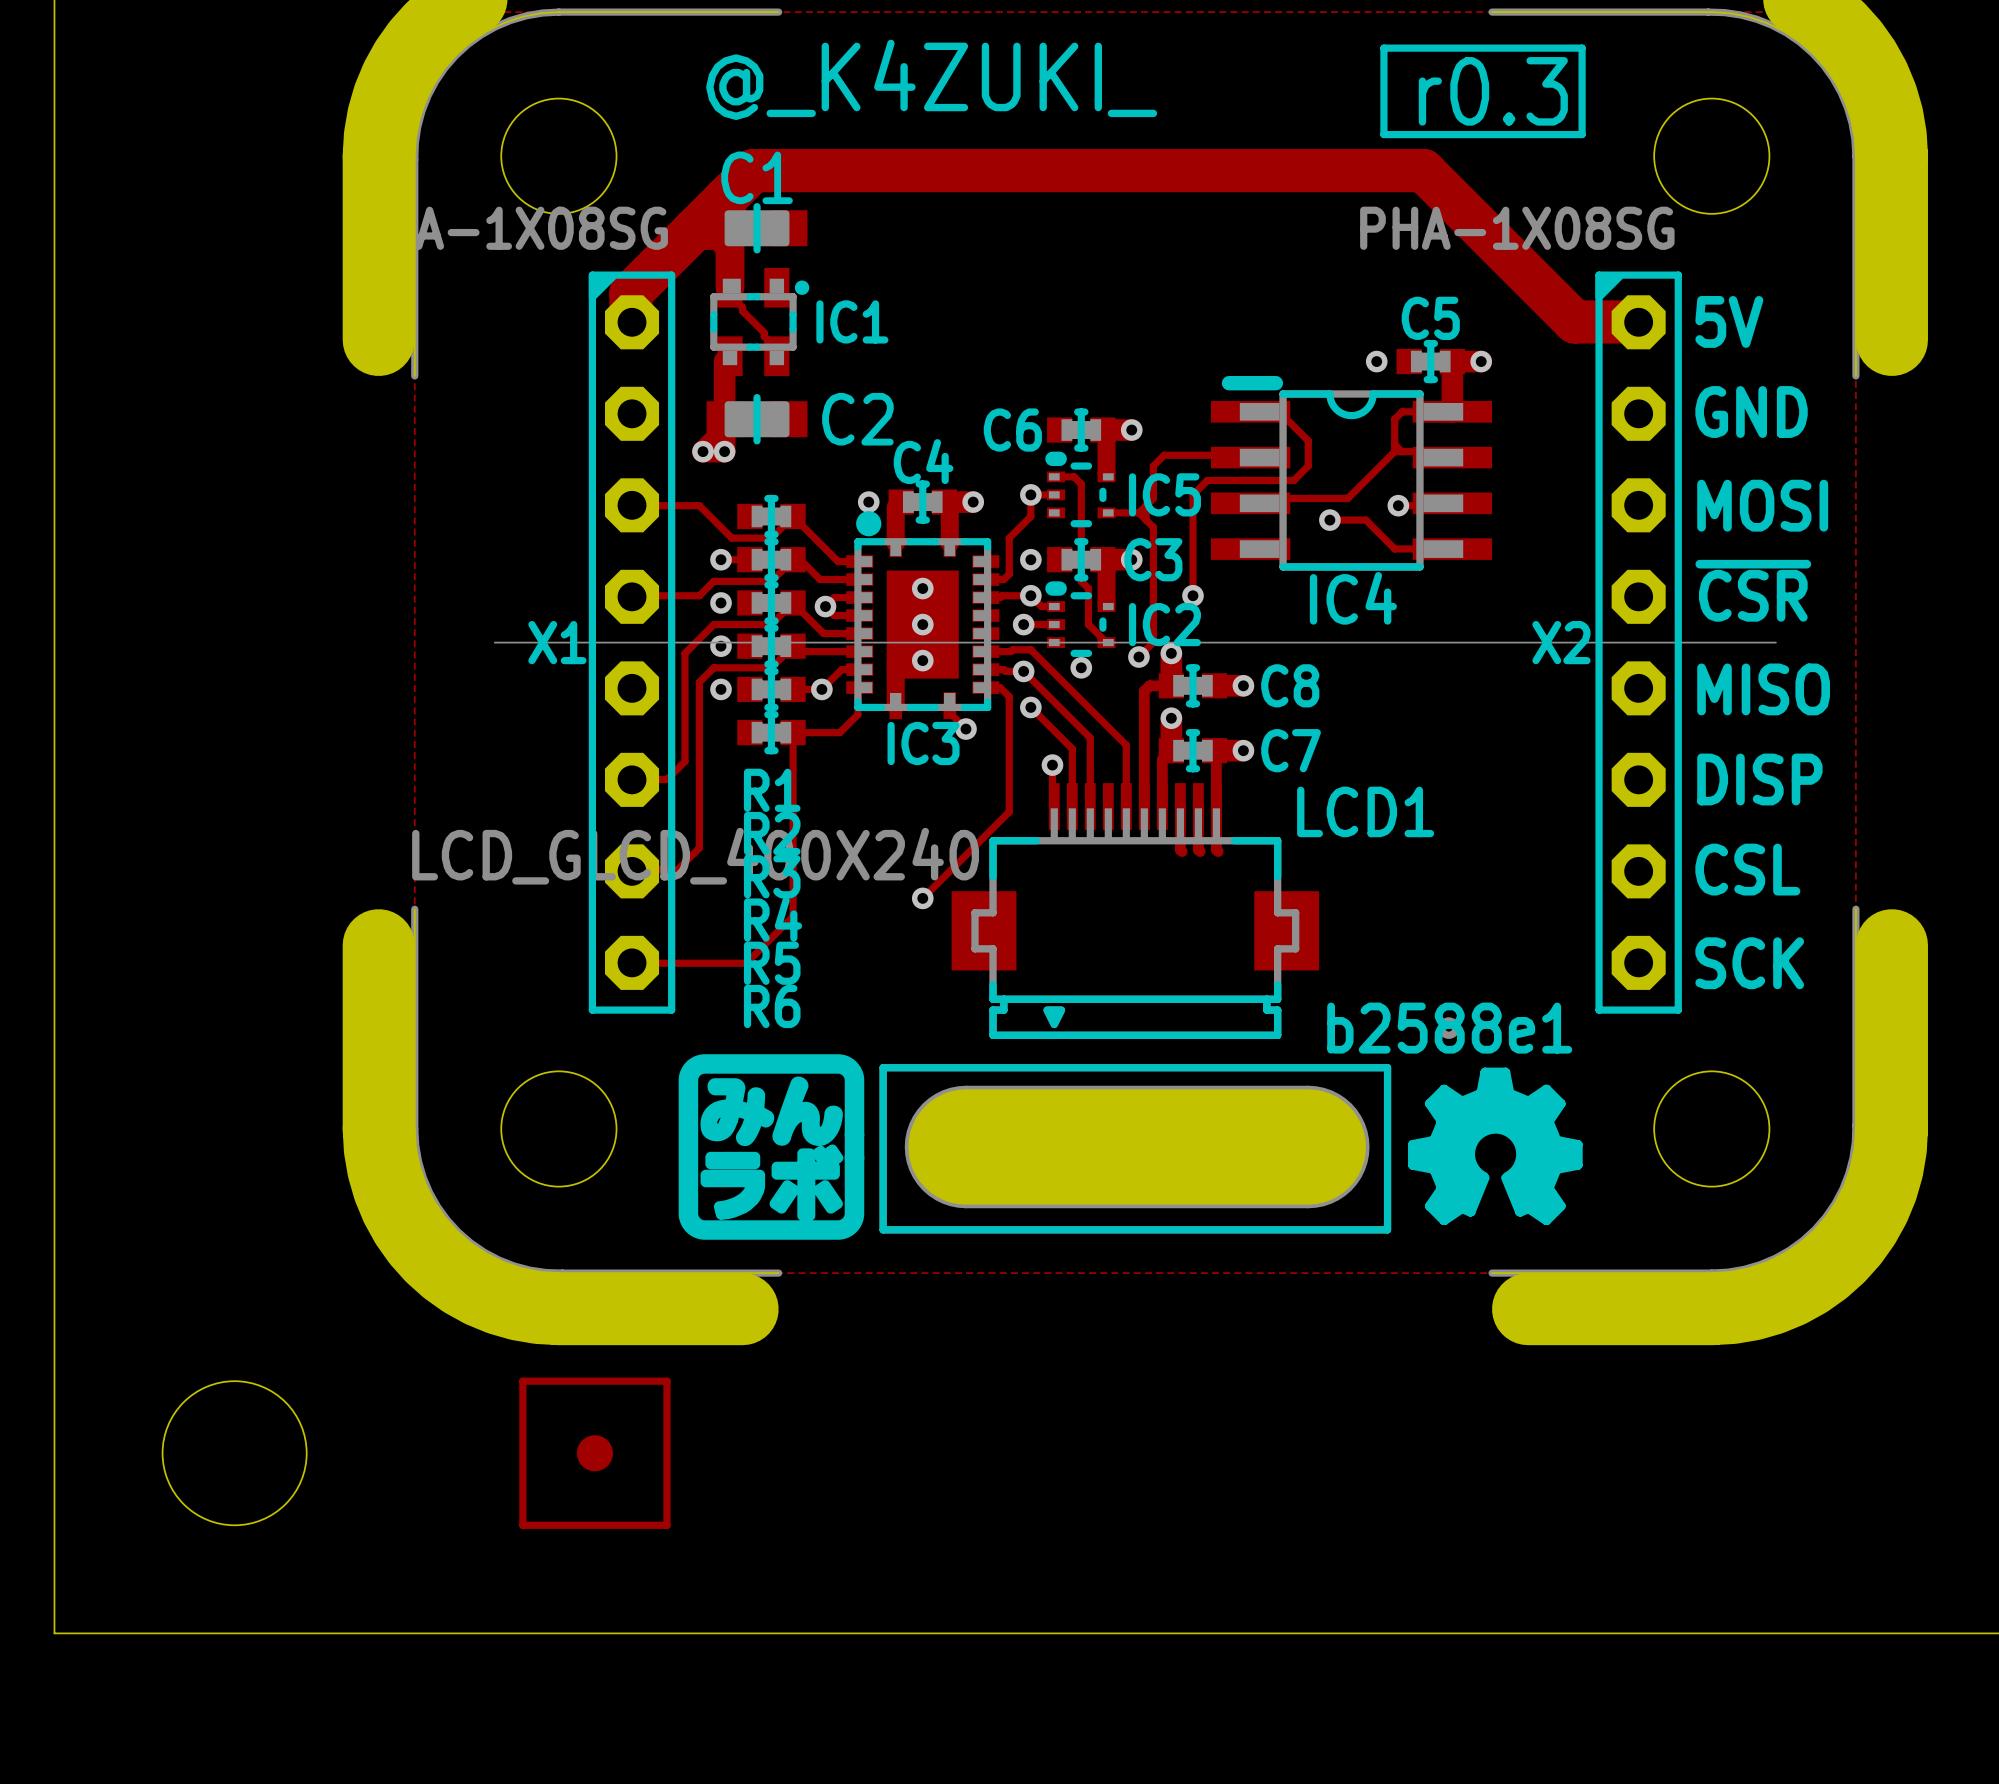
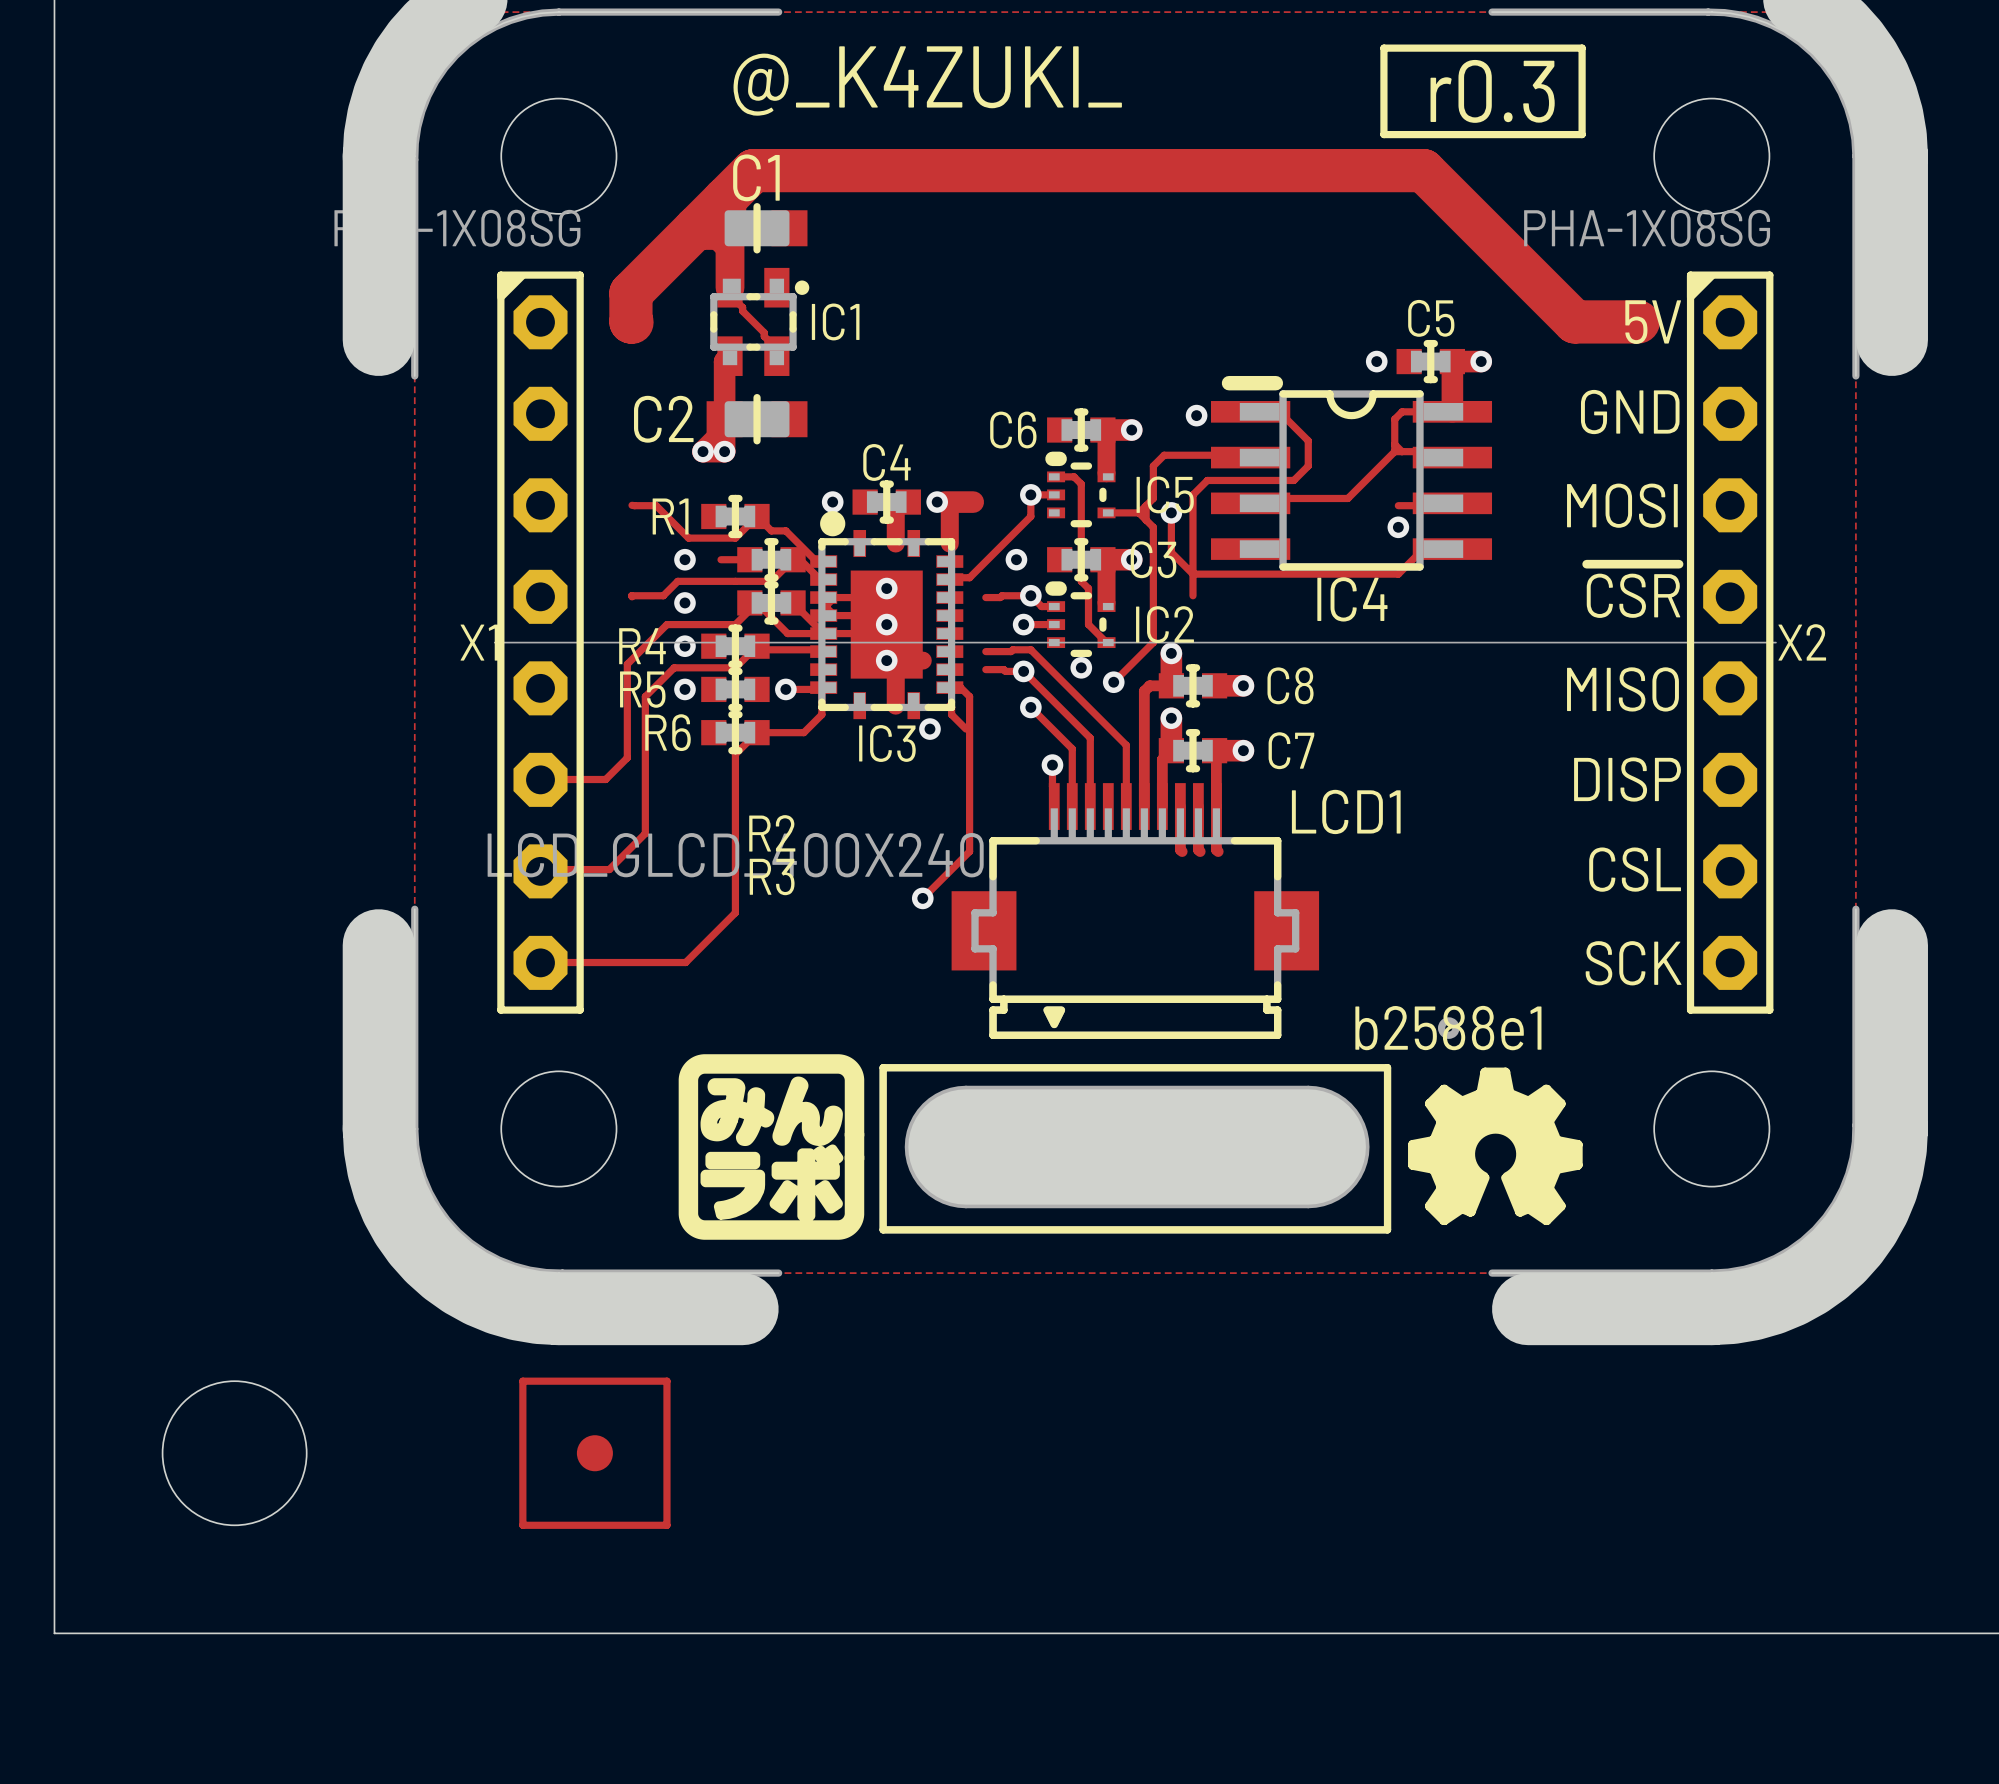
text position: 5V (1729, 321) -> 5V (1653, 322)
text position: GND (1751, 412) -> GND (1630, 412)
via: none -> (1196, 415)
C2 name position: C2 (857, 419) -> C2 (663, 419)
via: none -> (832, 502)
via: (868, 502) -> none
C4 position: (922, 502) -> (886, 502)
via: none -> (937, 502)
via: (973, 502) -> none
track: (656, 505) (699, 505) (731, 538) -> (656, 505) (688, 538) (731, 538)
via position: (1398, 505) -> (1398, 527)
text position: MOSI (1762, 505) -> MOSI (1622, 505)
via: none -> (1171, 512)
R1 position: (771, 516) -> (735, 516)
track: (1329, 520) (1365, 520) (1394, 548) (1423, 548) -> (1171, 512) (1171, 552) (1192, 574) (1398, 574) (1423, 548)
via: (1329, 520) -> none
track: (735, 538) (771, 538) (793, 516) (838, 561) (859, 561) -> (735, 538) (757, 516) (771, 530) (785, 530) (816, 561) (823, 561)
track: (1009, 538) (1009, 574) (1003, 579) (985, 579) -> (1009, 538) (969, 577) (949, 579)
via: none -> (684, 559)
via: (721, 559) -> none
via position: (1030, 559) -> (1016, 559)
track: (823, 579) (859, 579) -> none
track: (713, 581) (699, 595) (663, 595) -> (713, 581) (677, 581) (663, 595)
via: none -> (886, 588)
via: (922, 588) -> none
text position: ~{CSR} (1753, 590) -> ~{CSR} (1633, 591)
via: (1192, 595) -> none
via: none -> (684, 602)
via: (721, 602) -> none
track: (789, 606) (771, 624) (735, 624) -> (823, 633) (787, 633) (757, 602) (735, 624)
via: (825, 606) -> none
IC3 position: (922, 615) -> (886, 615)
track: (713, 624) (684, 653) (684, 761) (666, 779) (632, 779) -> (713, 624) (666, 624) (627, 664) (627, 757) (605, 779) (540, 779)
via: none -> (886, 624)
via: (922, 624) -> none
X1 position: (632, 642) -> (540, 642)
X2 name position: X2 (1561, 642) -> X2 (1802, 642)
X2 position: (1638, 642) -> (1730, 642)
via: none -> (684, 646)
via: (721, 646) -> none
R4 position: (771, 646) -> (735, 646)
track: (816, 651) (798, 651) (793, 646) (771, 667) (735, 667) -> (816, 651) (814, 649) (760, 649) (757, 646) (735, 667)
track: (823, 651) (859, 651) -> none
track: none -> (1138, 657) (1113, 682)
via position: (1138, 657) -> (1113, 682)
via: none -> (886, 660)
via: (922, 660) -> none
track: (713, 667) (699, 682) (699, 847) (677, 869) (632, 869) (632, 871) -> (713, 667) (674, 667) (645, 696) (645, 833) (609, 869) (542, 869) (540, 871)
track: (859, 669) (841, 669) (823, 687) -> none
track: (859, 687) (857, 689) (857, 714) (839, 732) (803, 732) -> (821, 689) (821, 714) (803, 732)
track: (985, 687) (1000, 687) (1009, 696) (1009, 811) (969, 851) -> (949, 687) (960, 687) (969, 696) (969, 851)
via: none -> (684, 689)
via: (721, 689) -> none
R5 position: (771, 689) -> (735, 689)
via: none -> (785, 689)
via: (821, 689) -> none
text position: MISO (1763, 689) -> MISO (1622, 689)
via: none -> (929, 729)
via: (966, 729) -> none
R6 position: (771, 732) -> (735, 732)
track: (793, 732) (793, 916) (746, 963) (632, 962) -> (793, 732) (757, 732) (735, 754) (735, 912) (685, 962) (540, 962)
text position: DISP (1759, 779) -> DISP (1627, 779)
R1 name position: R1 (772, 790) -> R1 (670, 516)
text position: CSL (1747, 869) -> CSL (1635, 869)
R4 name position: R4 (772, 919) -> R4 (642, 646)
R5 name position: R5 (772, 963) -> R5 (642, 689)
text position: SCK (1749, 963) -> SCK (1633, 963)
R6 name position: R6 (772, 1006) -> R6 (667, 732)

